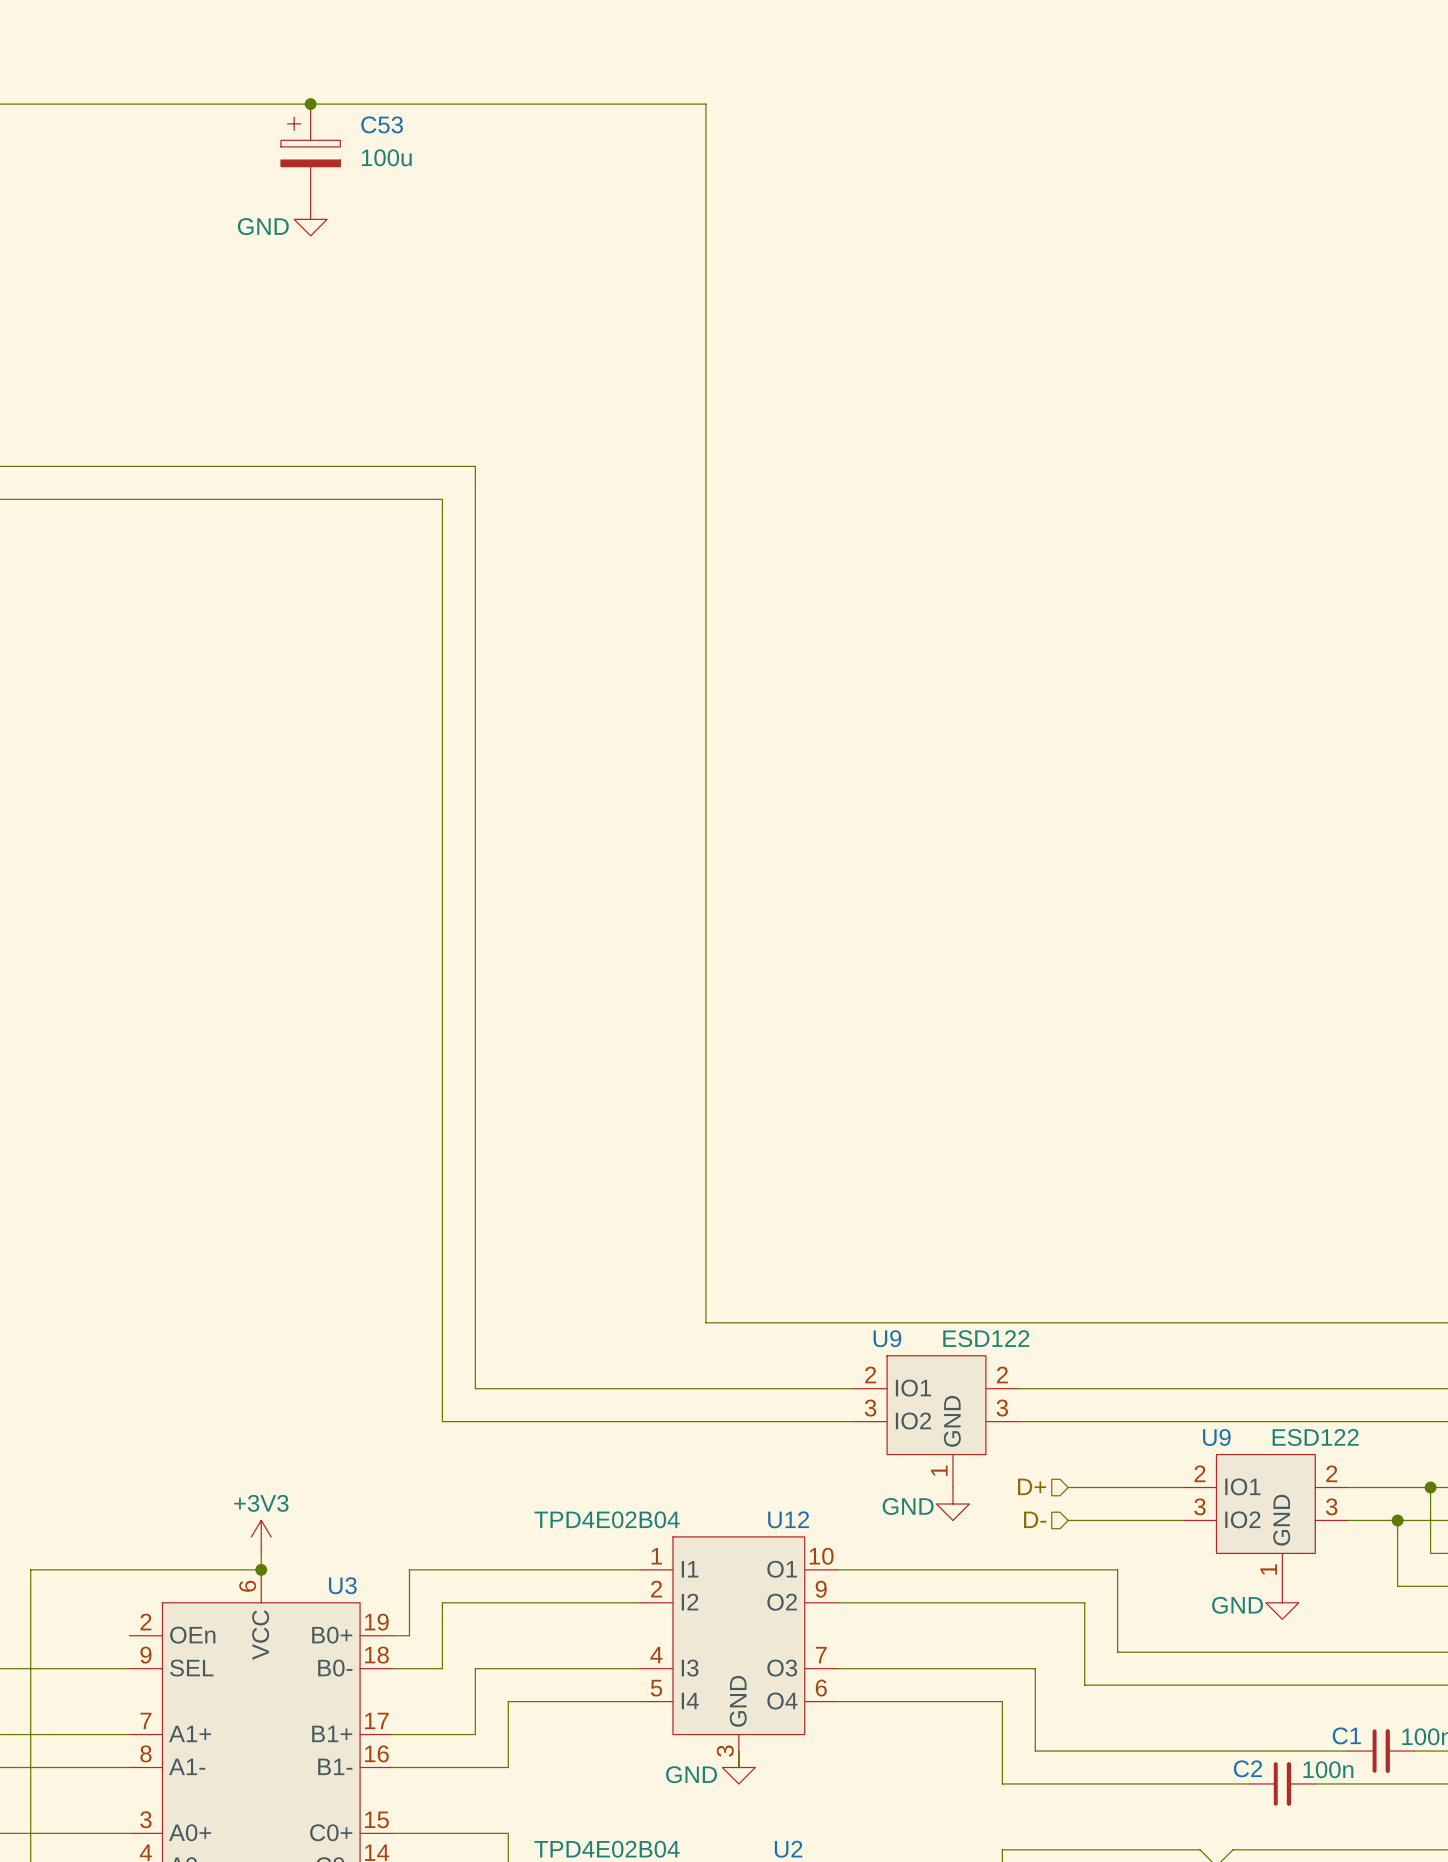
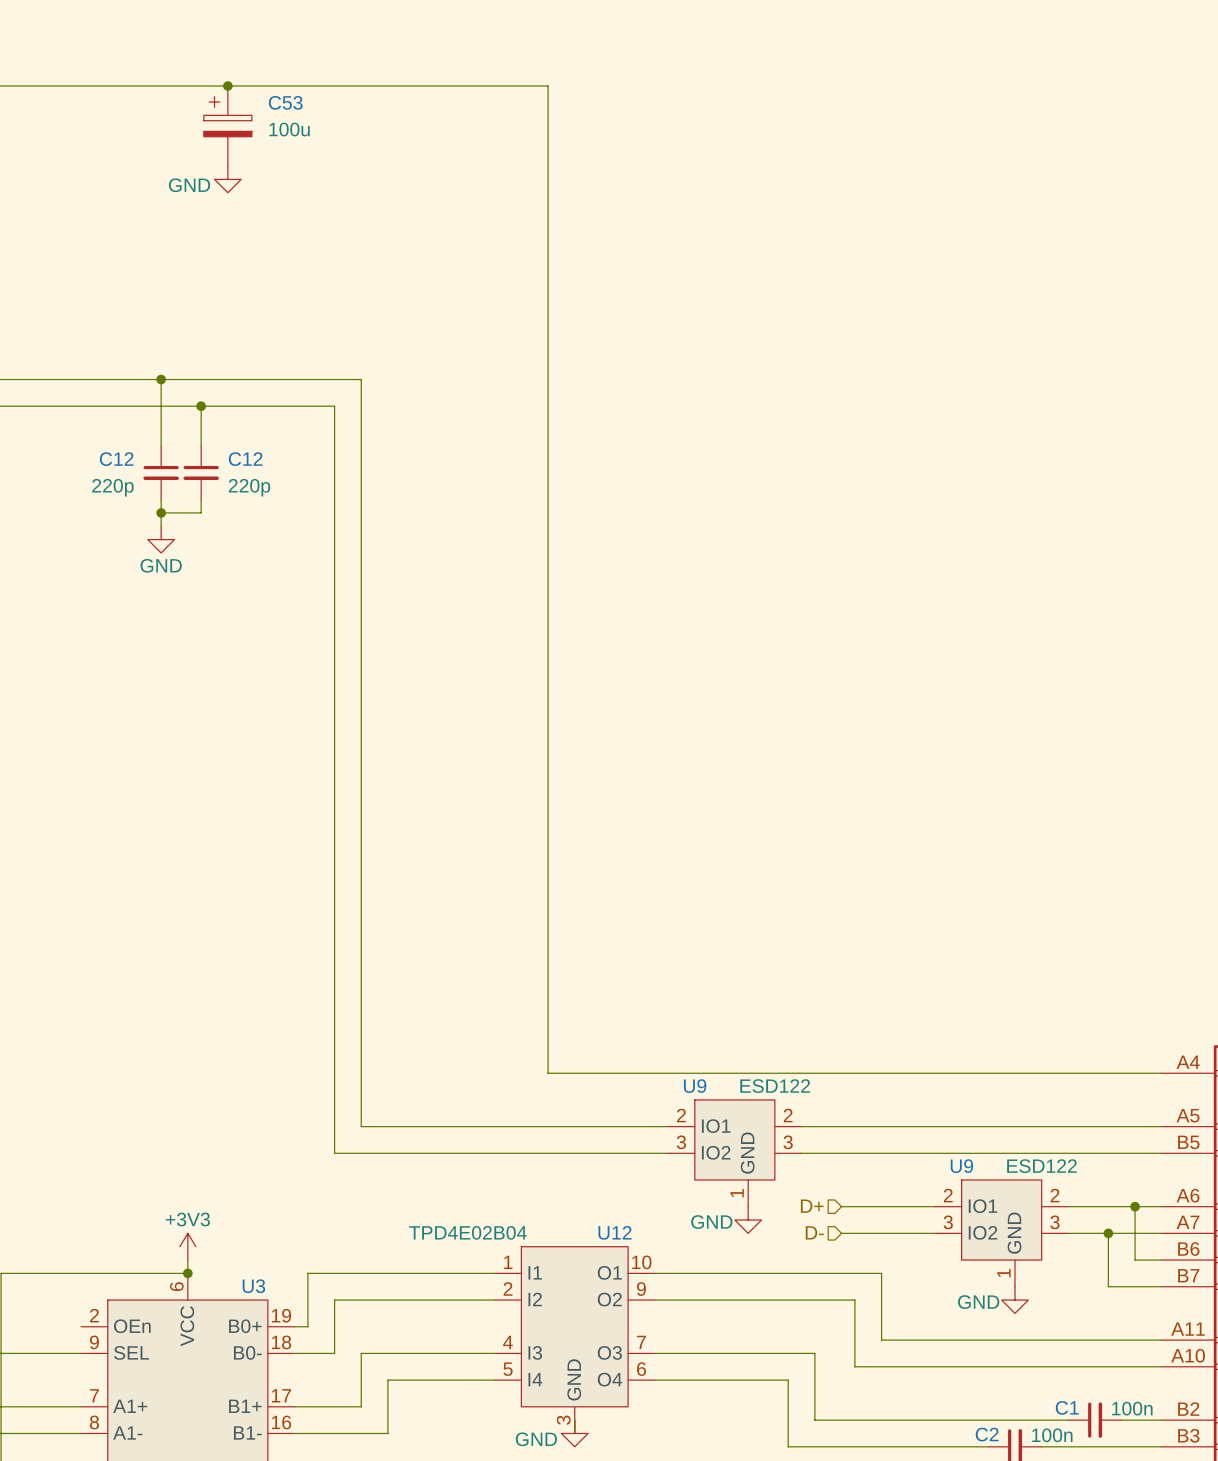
wire: none -> (161, 379) (161, 446)
junction: none -> (161, 379)
wire: none -> (201, 406) (201, 446)
junction: none -> (201, 406)
C12: none -> 220p (161, 472)
C12: none -> 220p (201, 472)
wire: none -> (161, 499) (161, 526)
wire: none -> (201, 499) (201, 512) (161, 512)
junction: none -> (161, 512)
power symbol: none -> GND (161, 539)

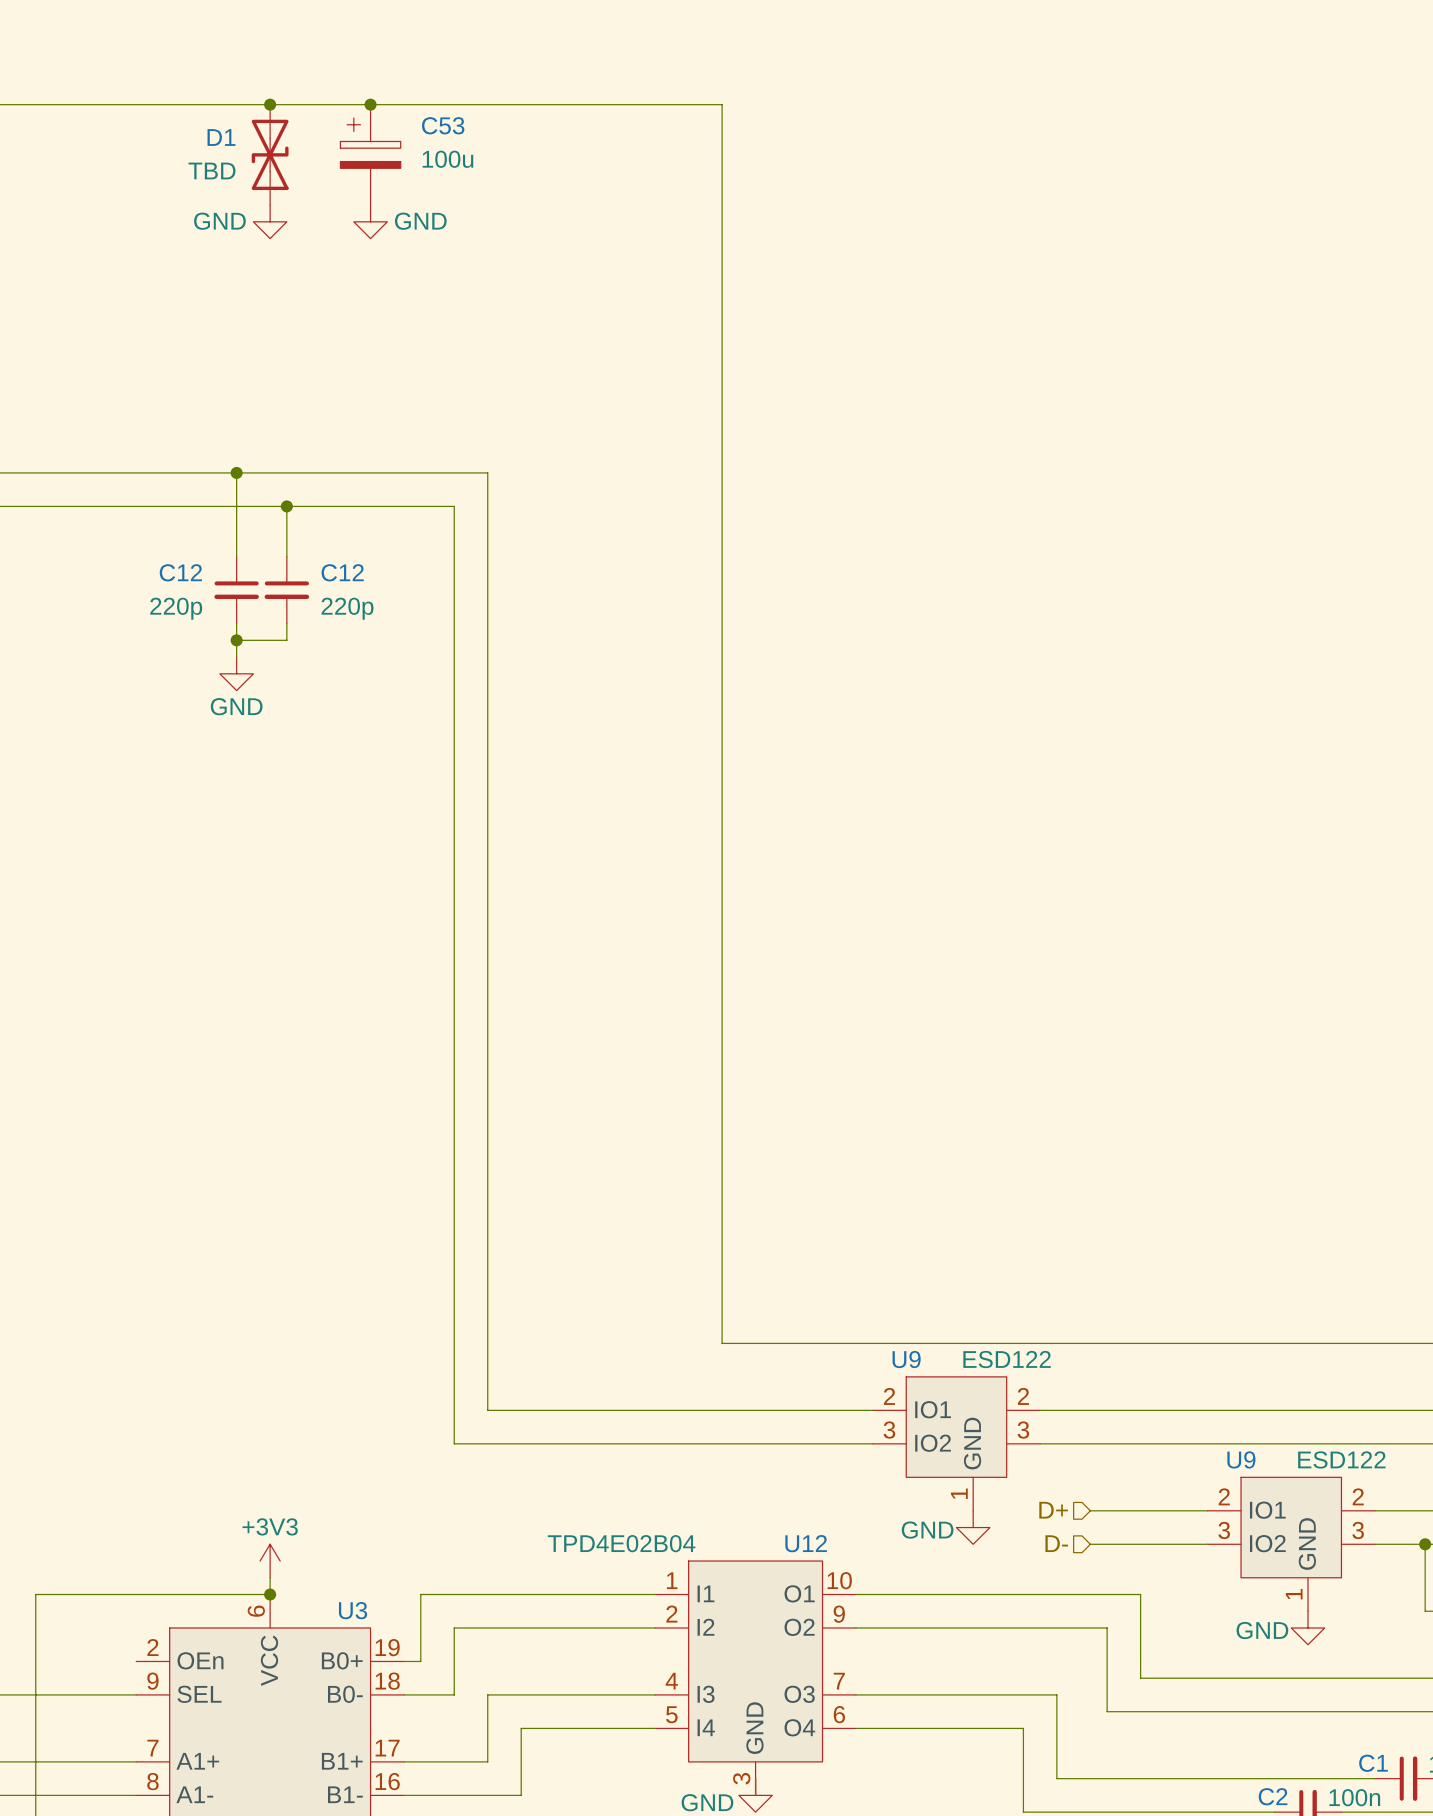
junction: none -> (270, 104)
junction: (227, 86) -> none
junction: none -> (370, 104)
D1: none -> TBD (270, 154)
C53 position: (227, 126) -> (370, 154)
power symbol: none -> GND (270, 221)
power symbol: GND (227, 179) -> none
power symbol: none -> GND (370, 221)

